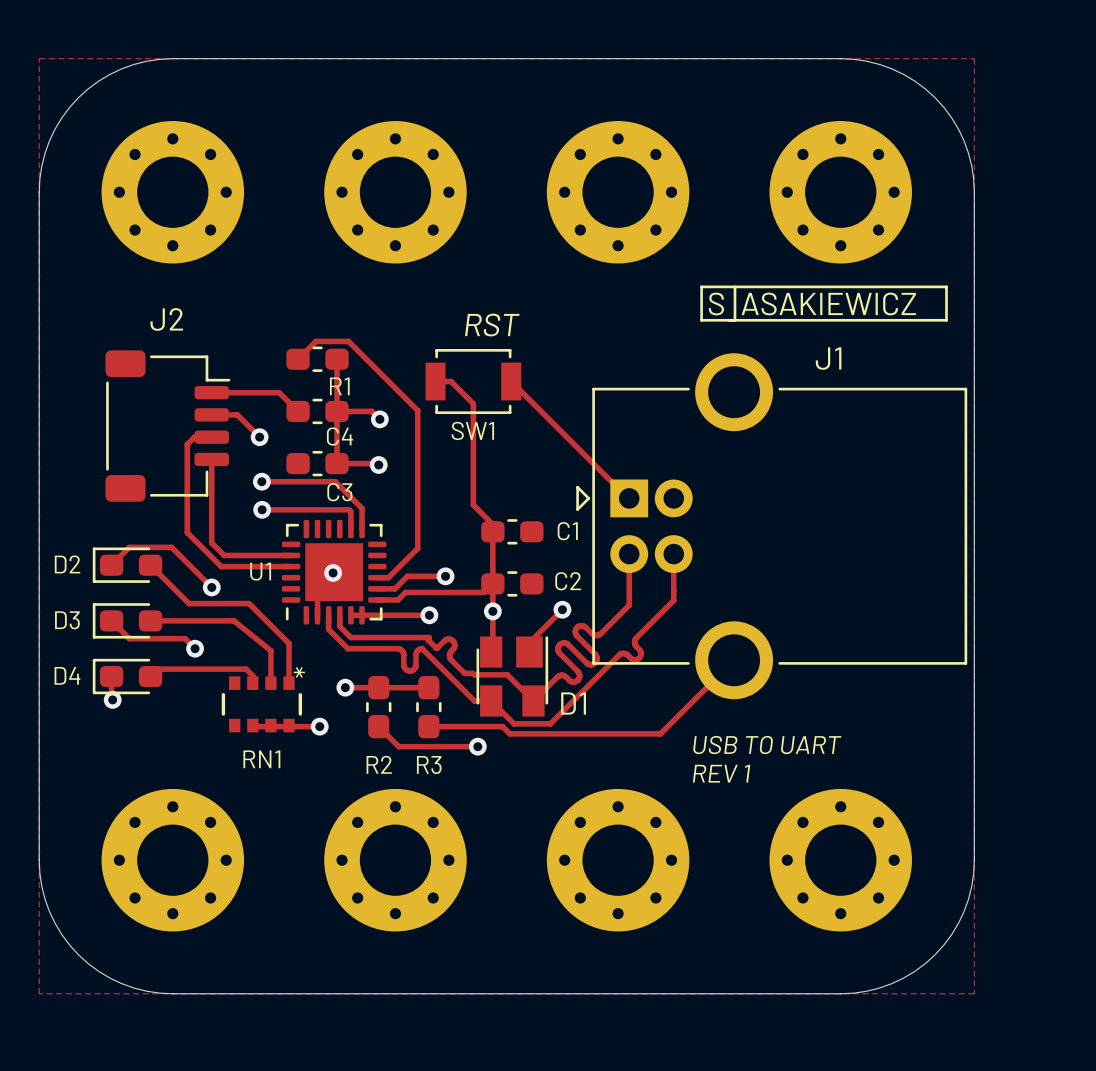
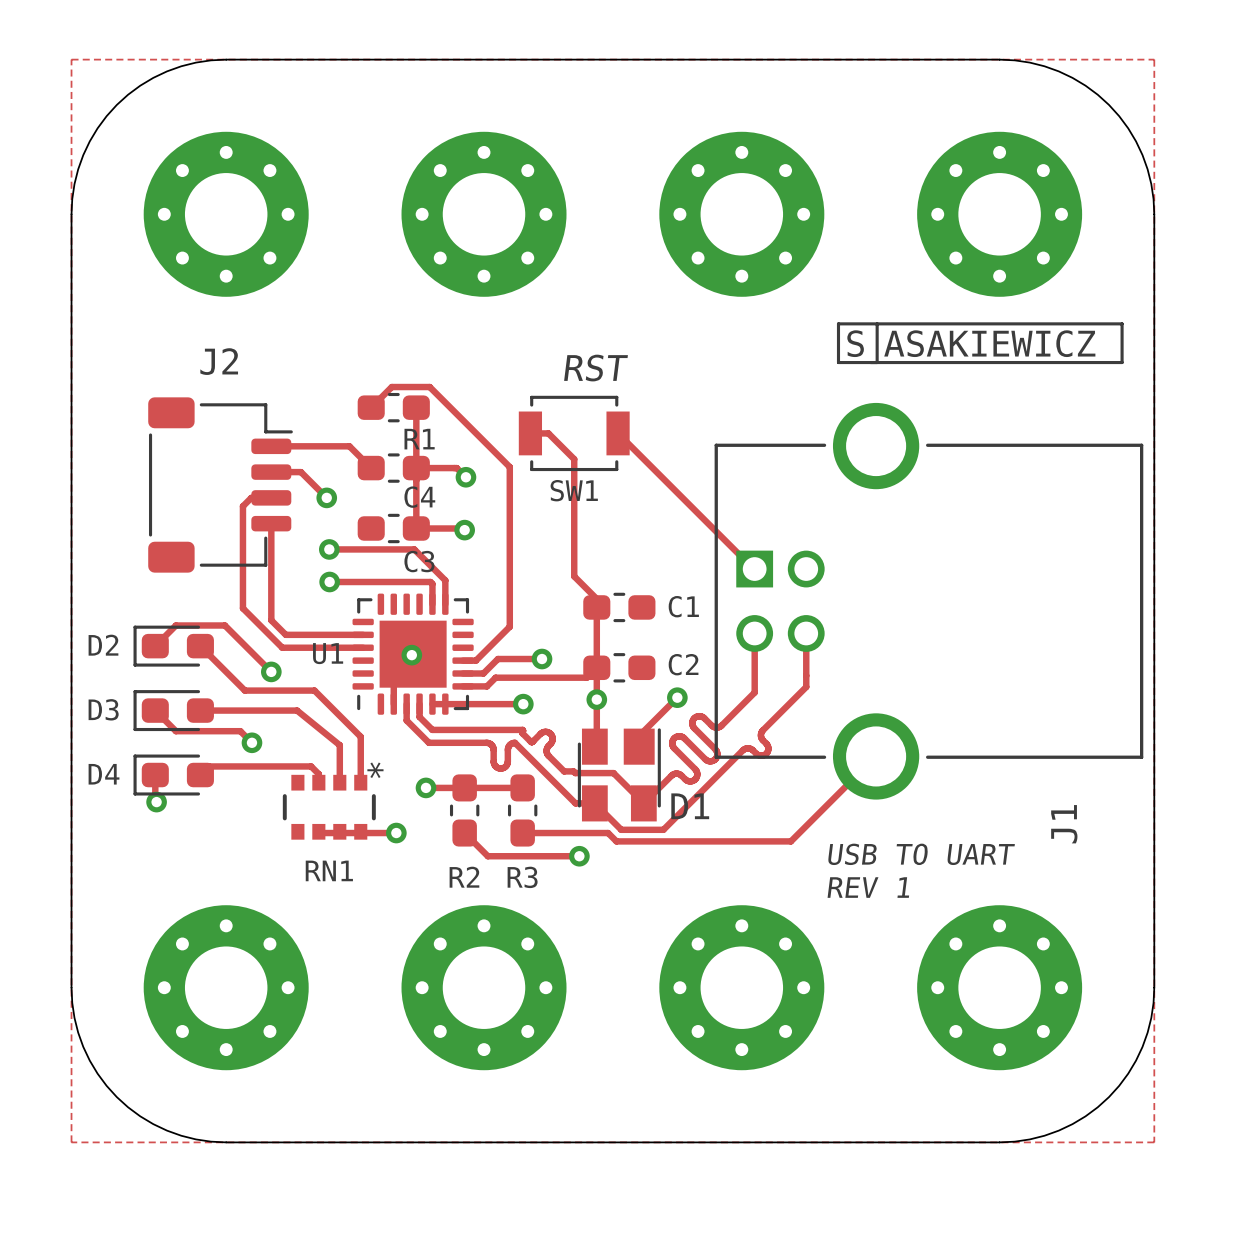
J1 footprint: [576, 353, 968, 700] -> [714, 402, 1144, 800]
J1 name rotation: 0° (828, 358) -> 90° counterclockwise (1064, 824)
J1 name position: J1 (828, 358) -> J1 (1064, 824)

